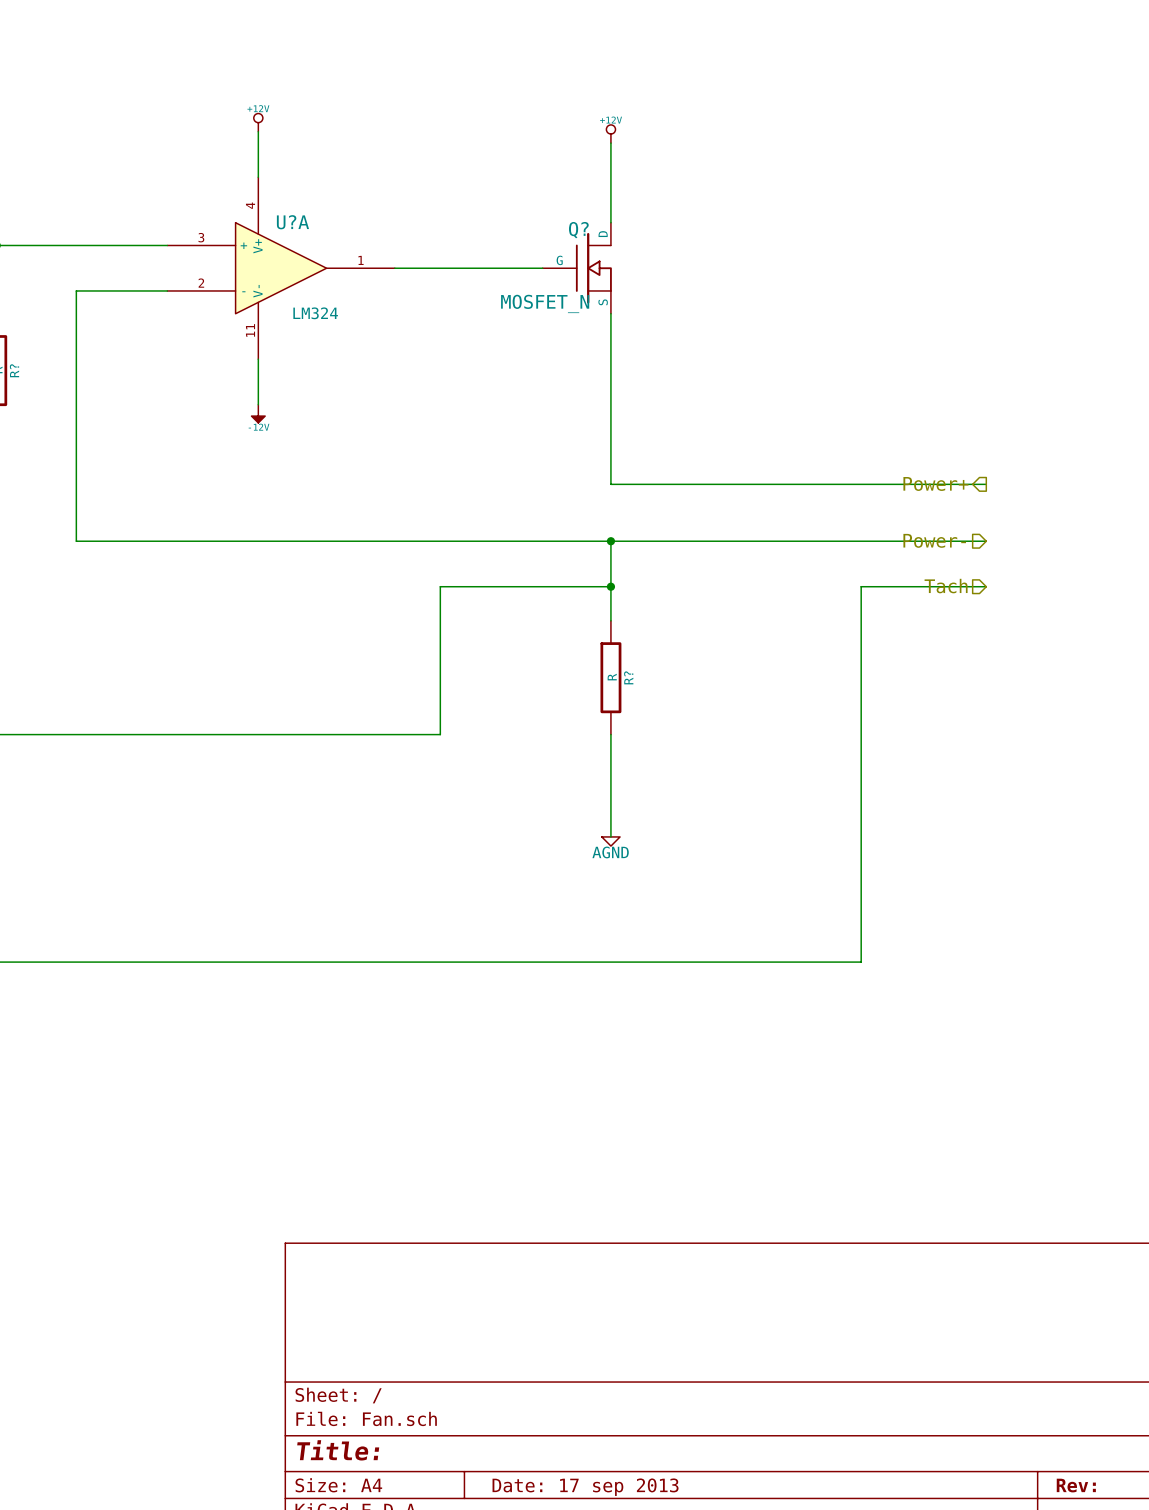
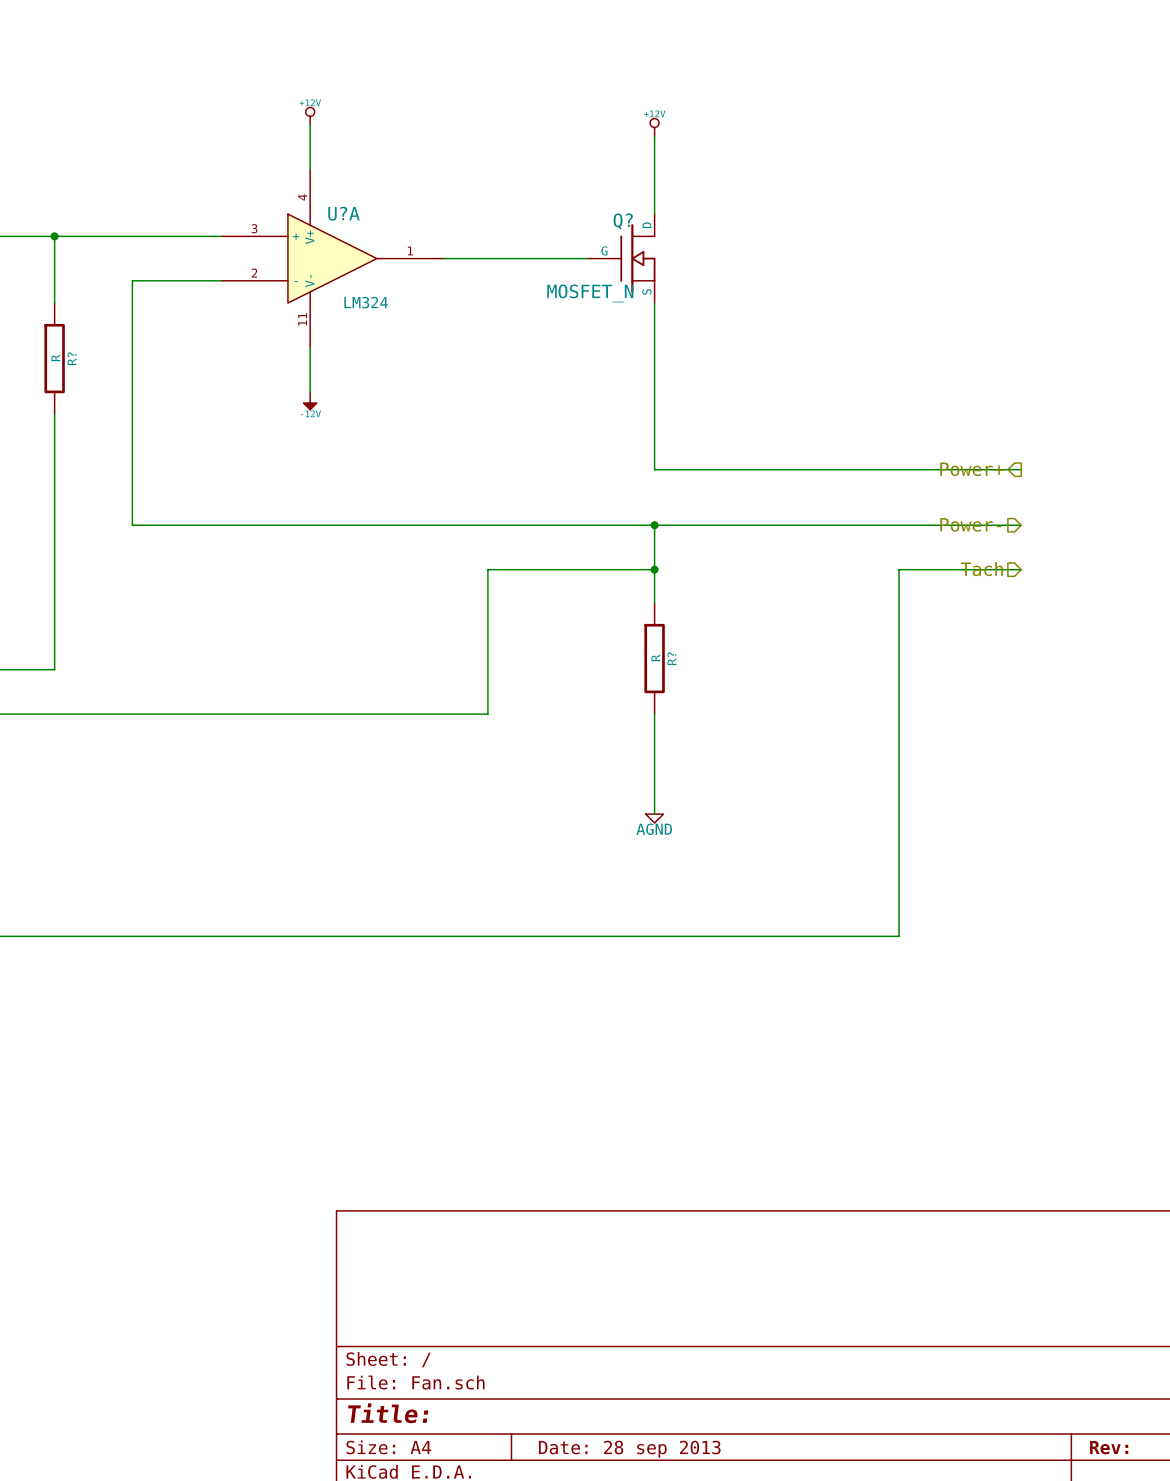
title block: Date: 17 sep 2013 (585, 1487) -> Date: 28 sep 2013 (629, 1449)

